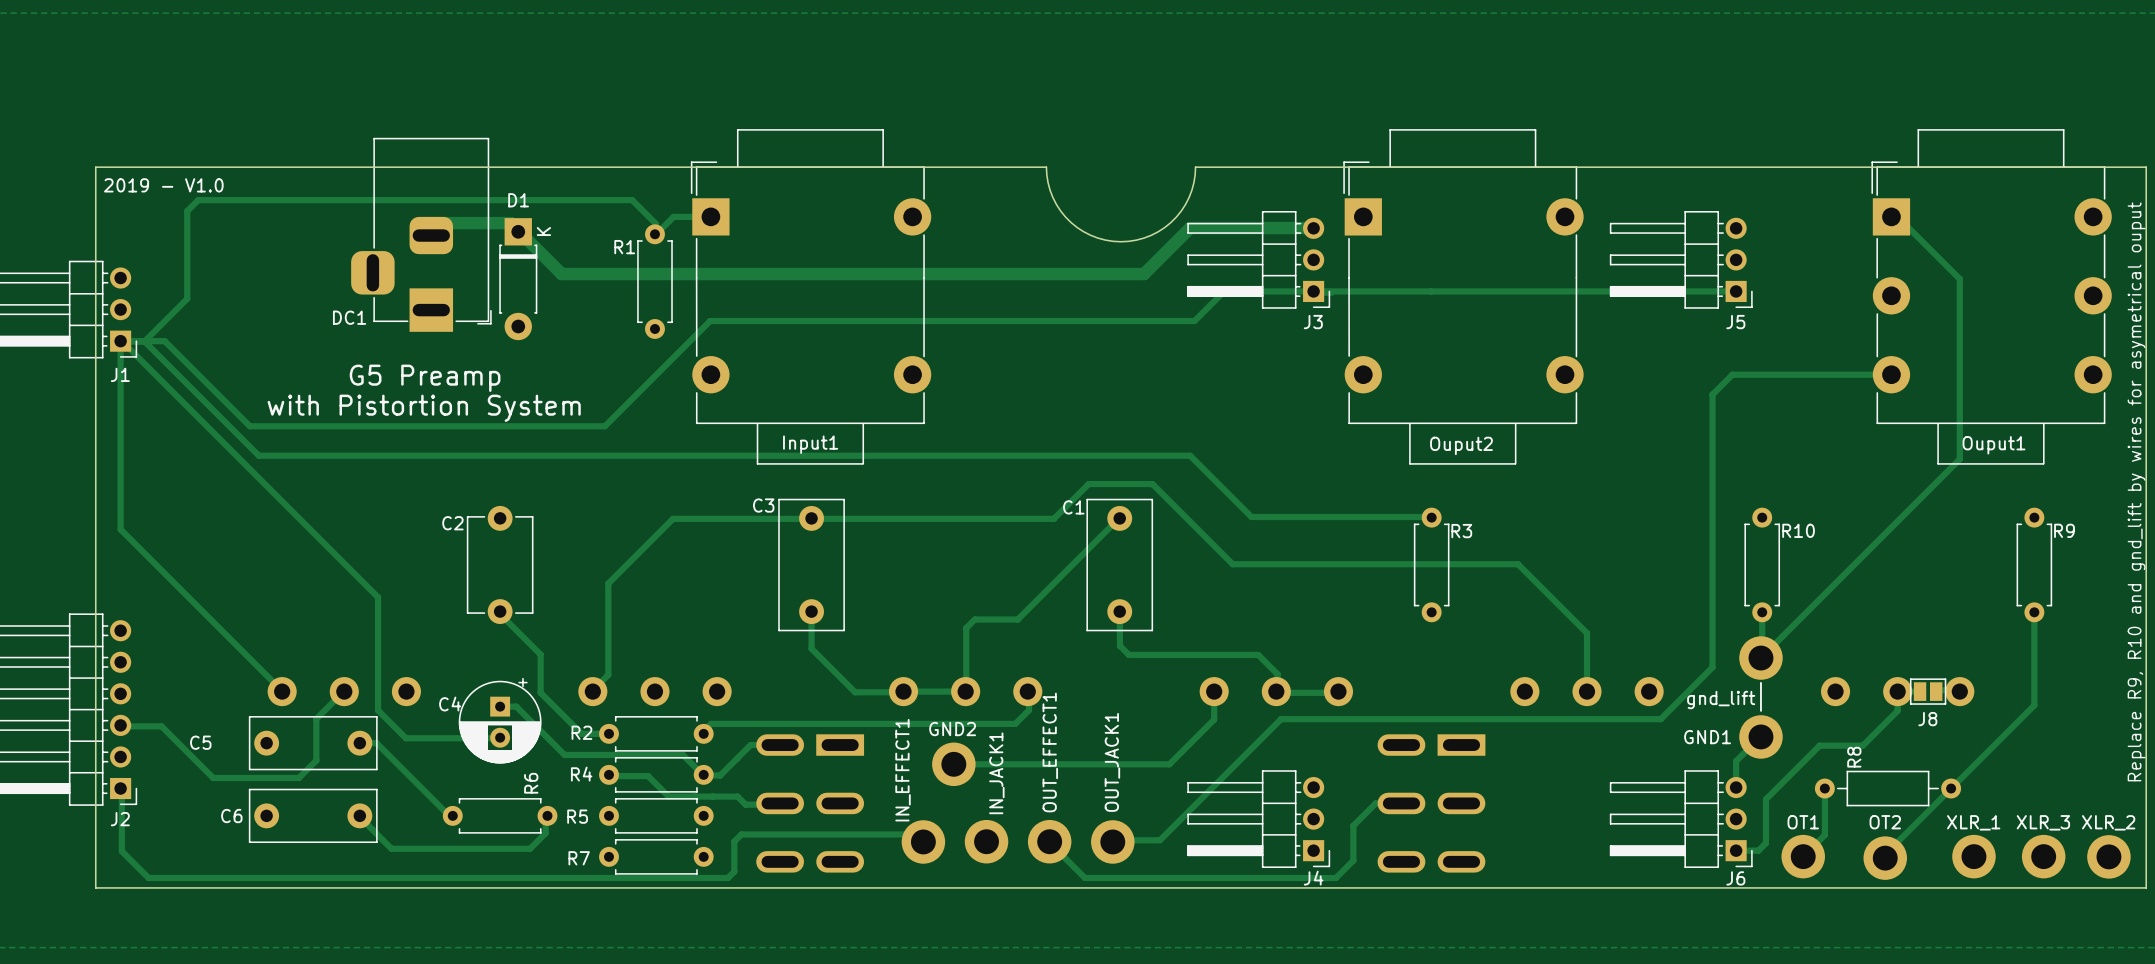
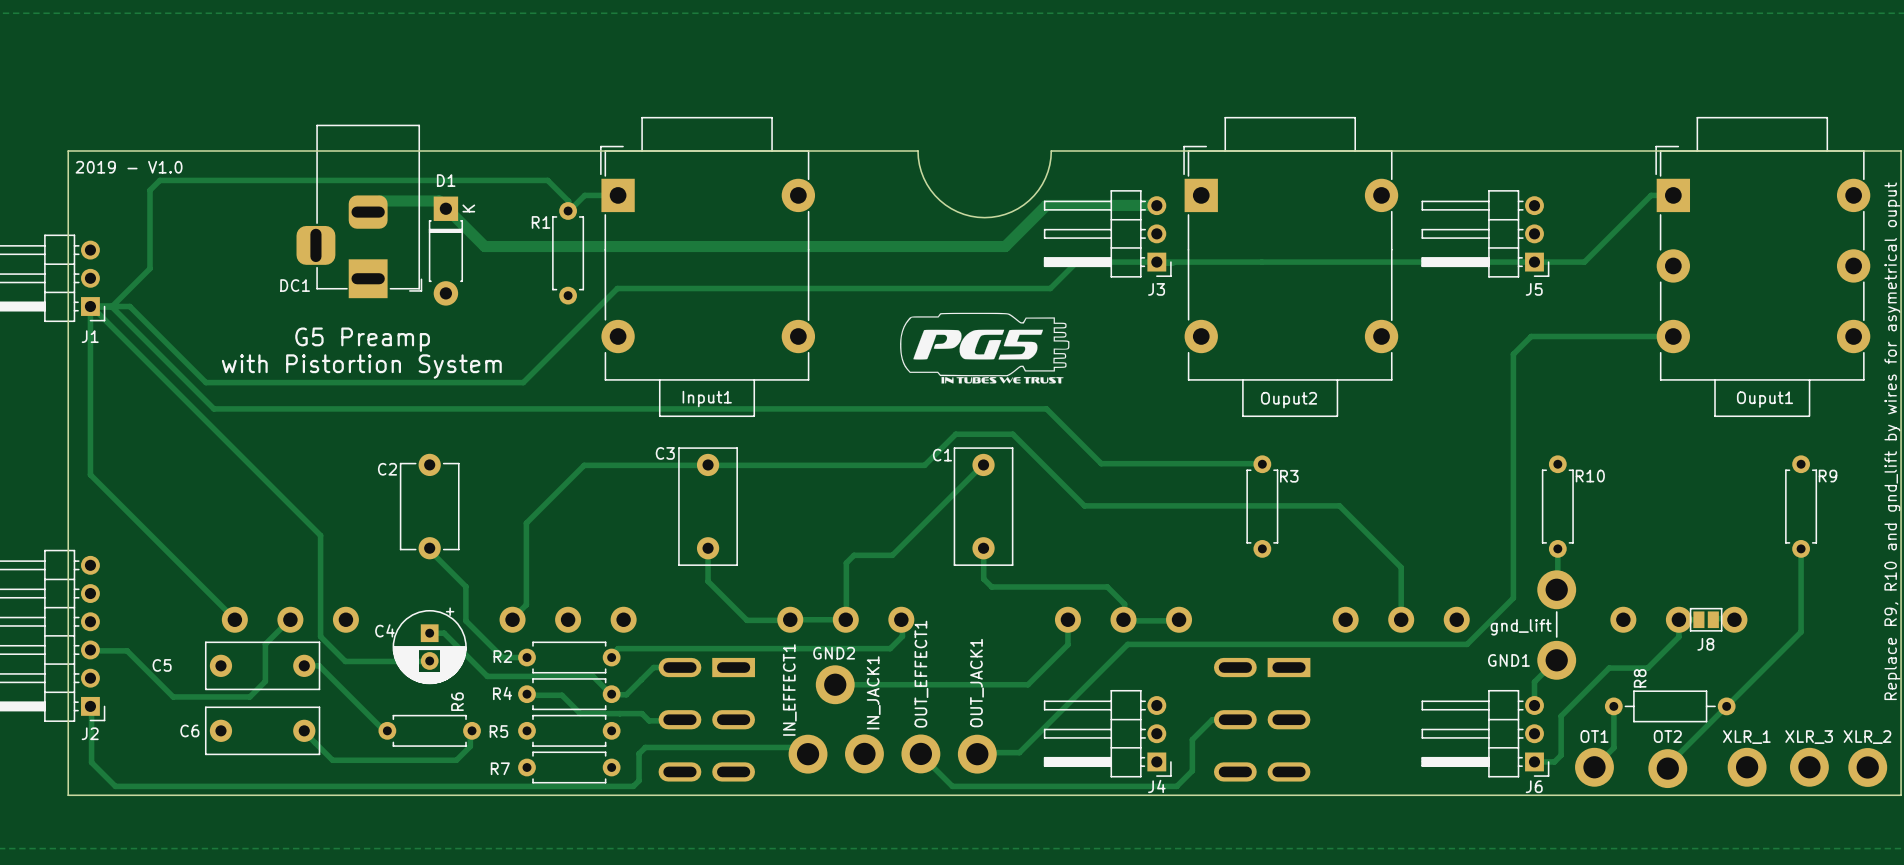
track: (1891, 216) (1897, 216) (1959, 279) (1959, 459) (1760, 658) -> (1673, 195) (1651, 195) (1584, 262) (1534, 262)
drawing: none -> [900, 312, 1070, 384]

